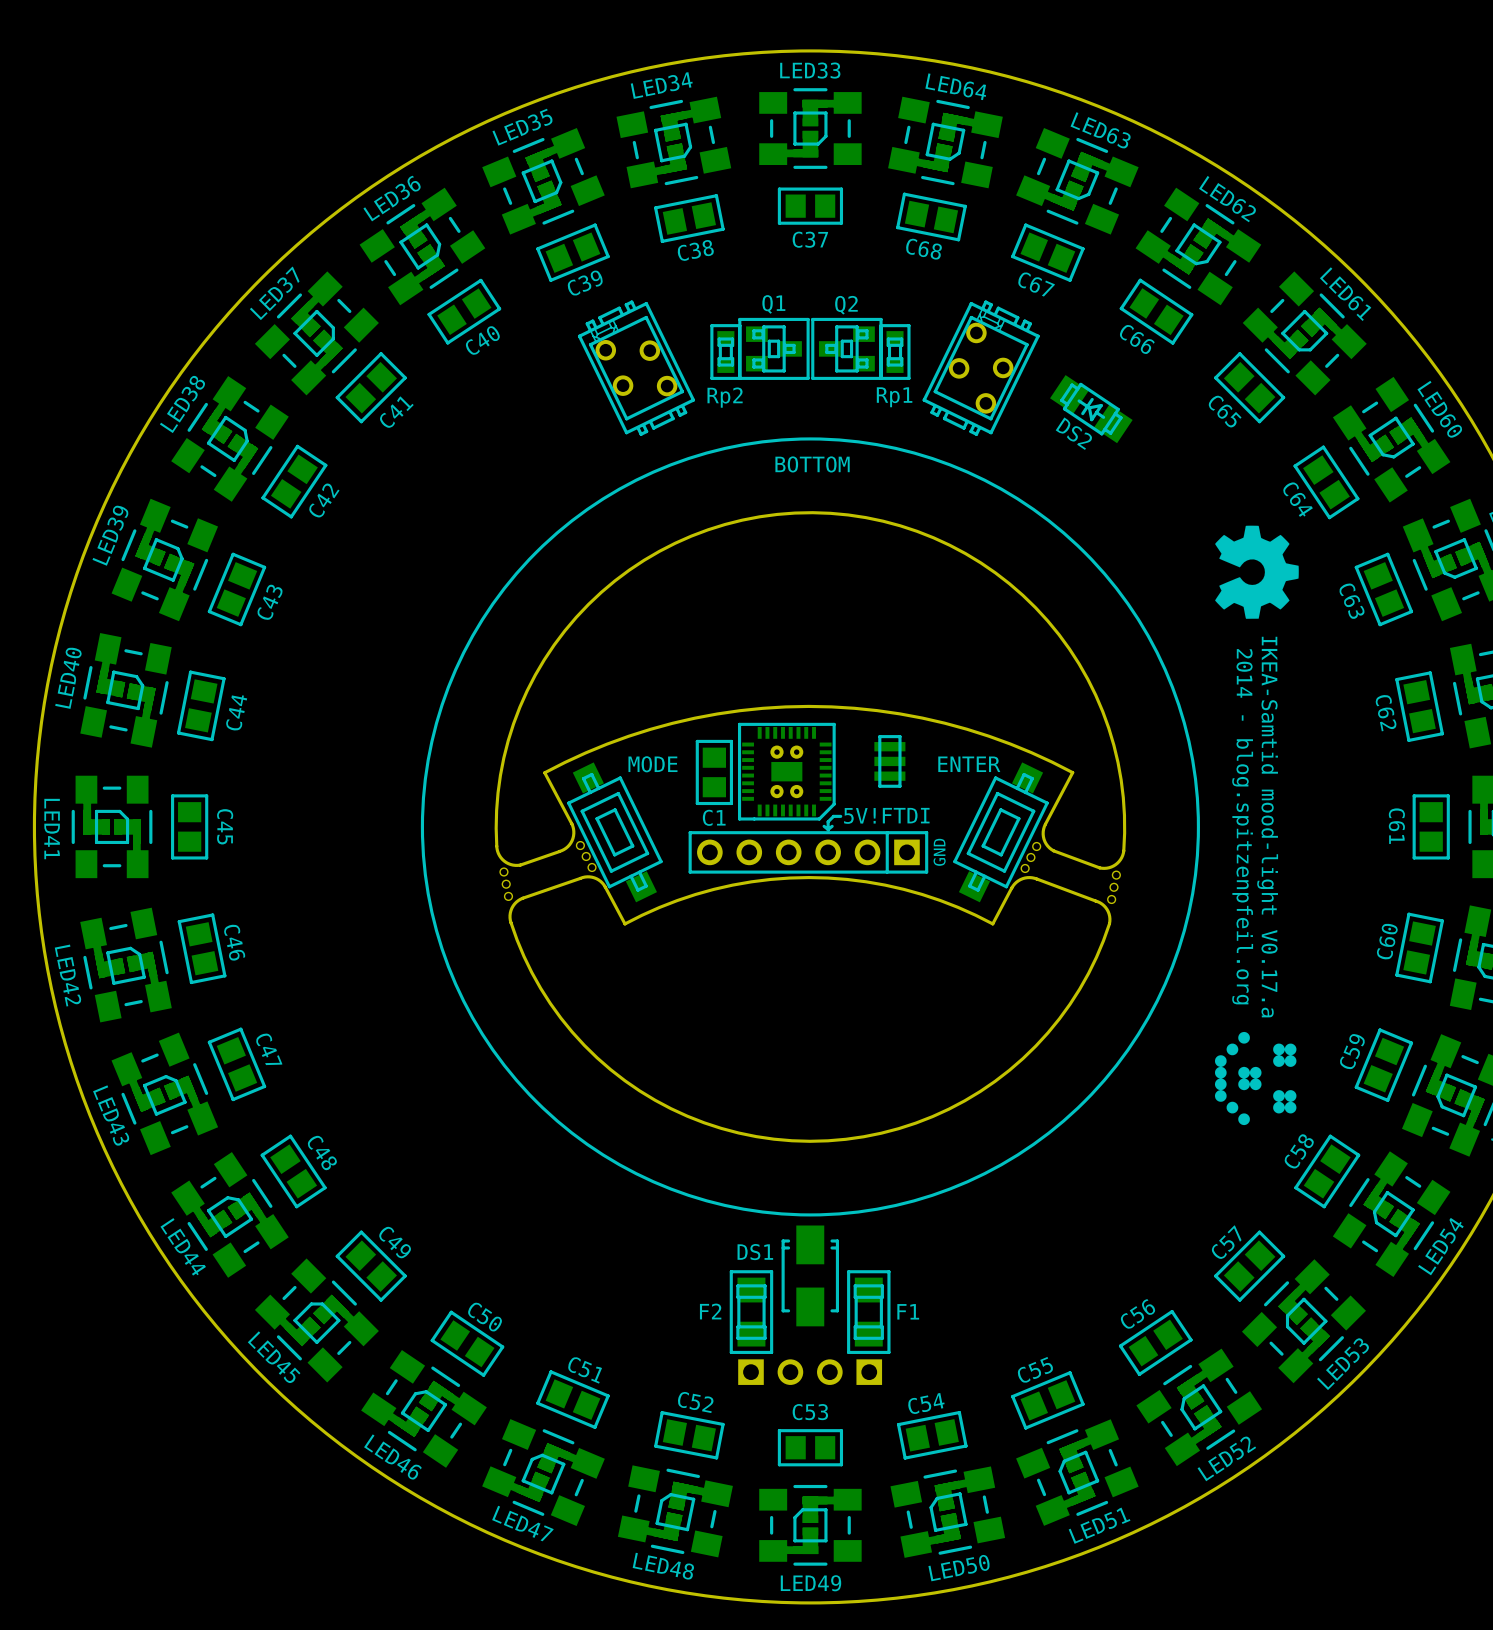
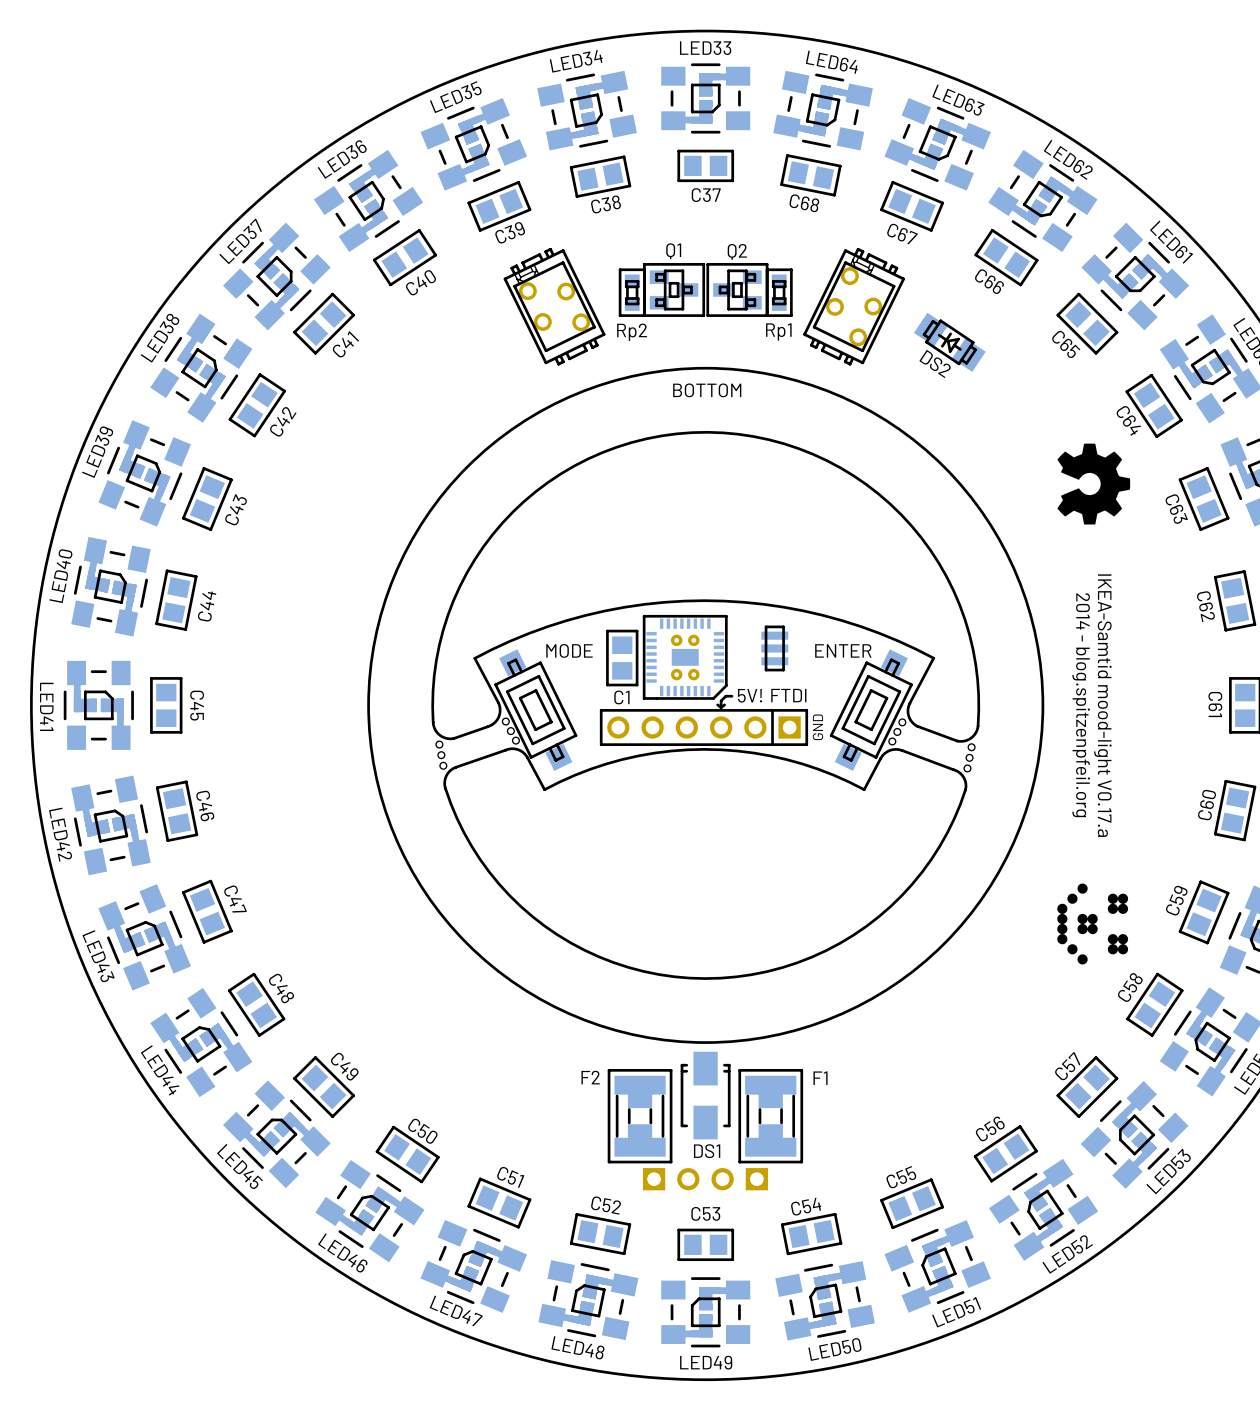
DS1 name position: DS1 (755, 1252) -> DS1 (707, 1151)
F2 footprint: [729, 1270, 774, 1354] -> [607, 1068, 673, 1164]
F1 footprint: [847, 1270, 891, 1354] -> [738, 1068, 804, 1164]
F2 name position: F2 (710, 1311) -> F2 (590, 1077)
F1 name position: F1 (908, 1311) -> F1 (820, 1078)

